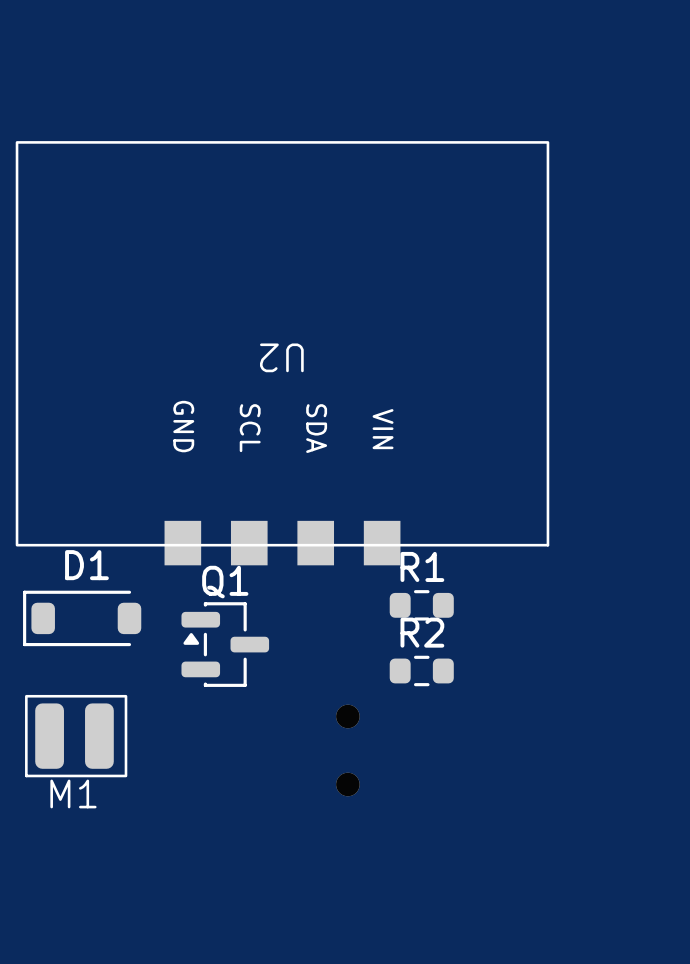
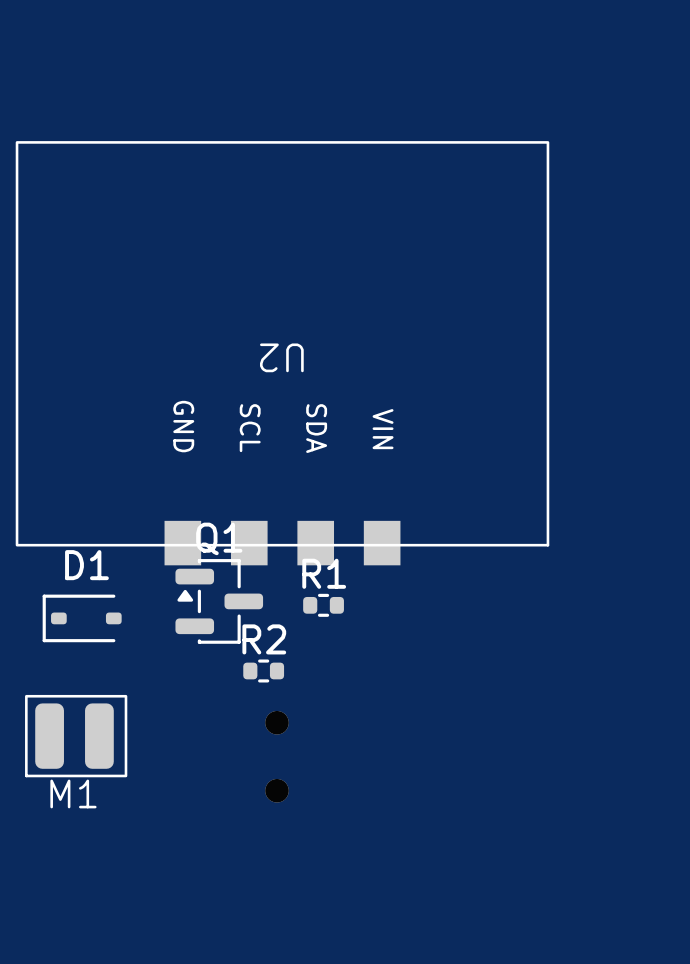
D1 footprint: [23, 590, 142, 647] -> [42, 594, 122, 643]
R1 footprint: [389, 590, 454, 621] -> [303, 593, 344, 617]
Q1 position: (225, 644) -> (219, 601)
R2 footprint: [389, 655, 454, 687] -> [243, 659, 285, 683]
part position: (347, 750) -> (277, 756)

